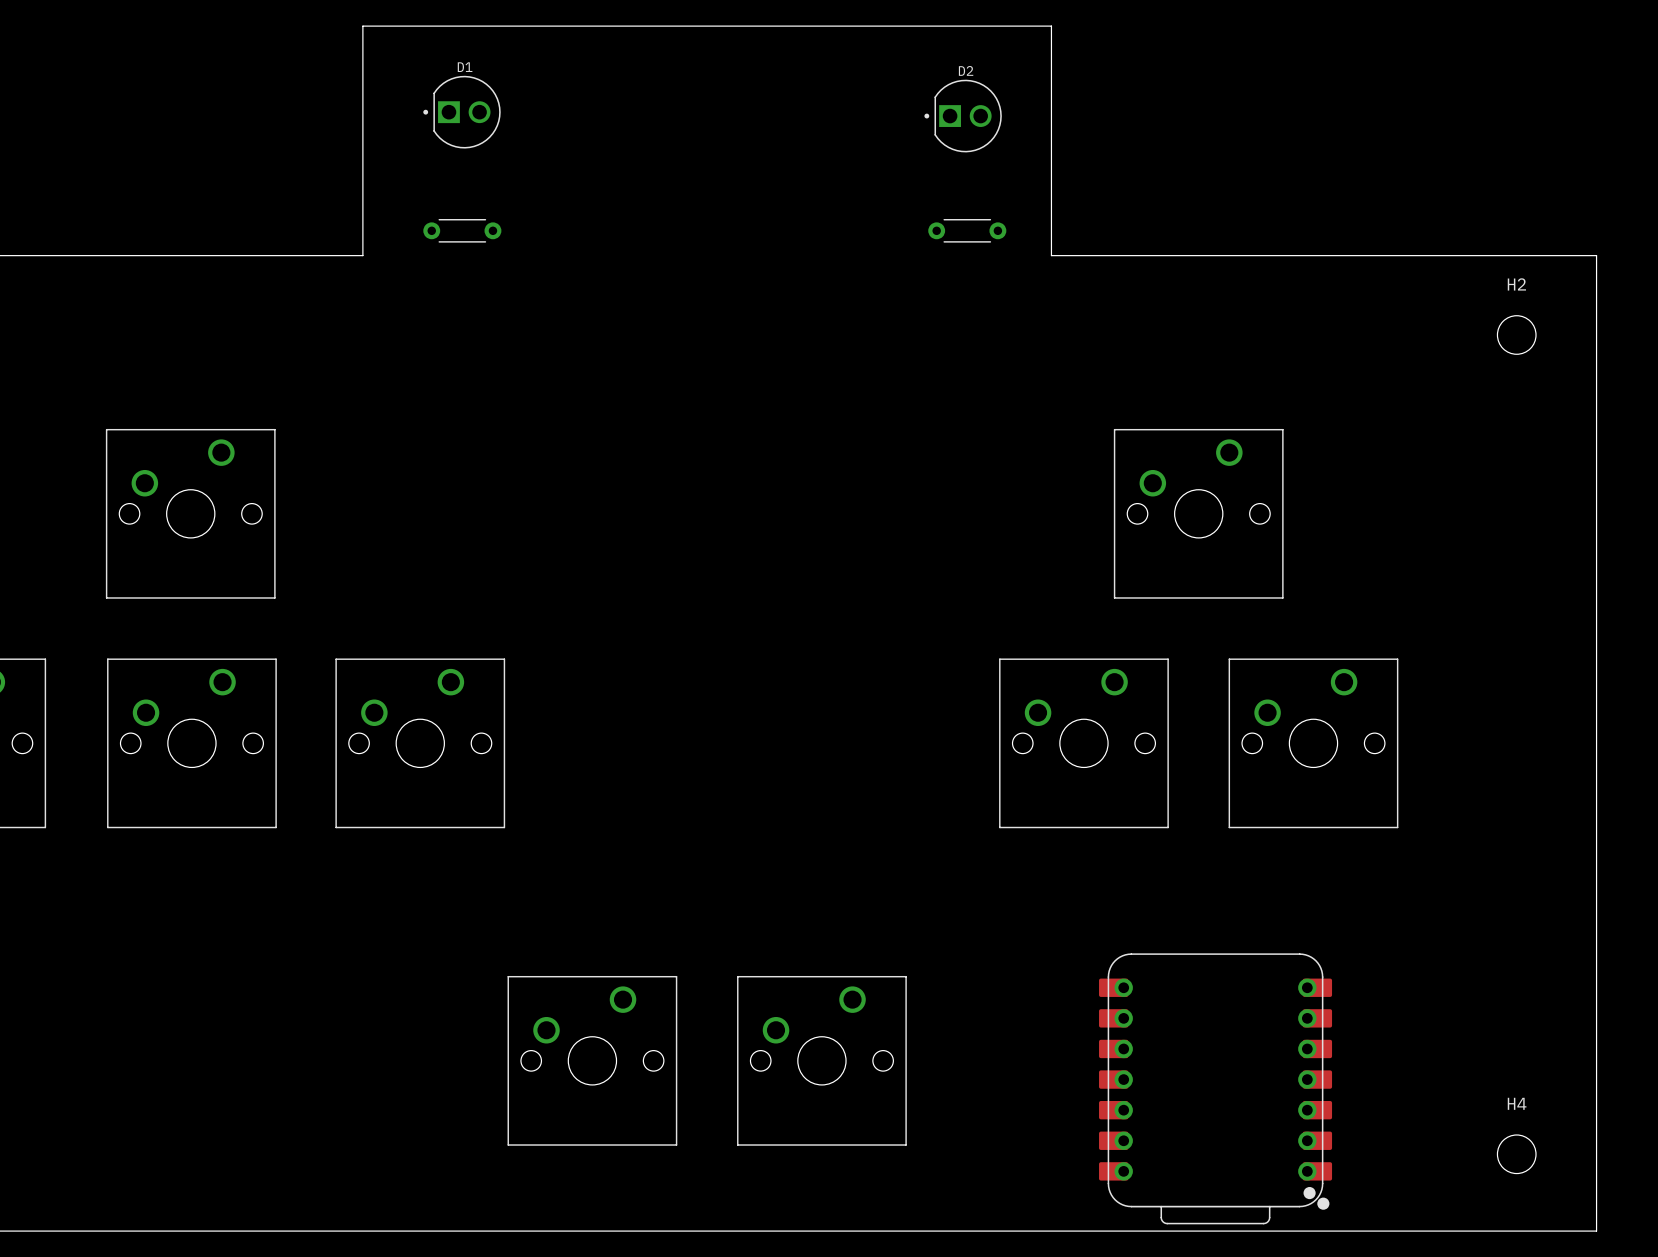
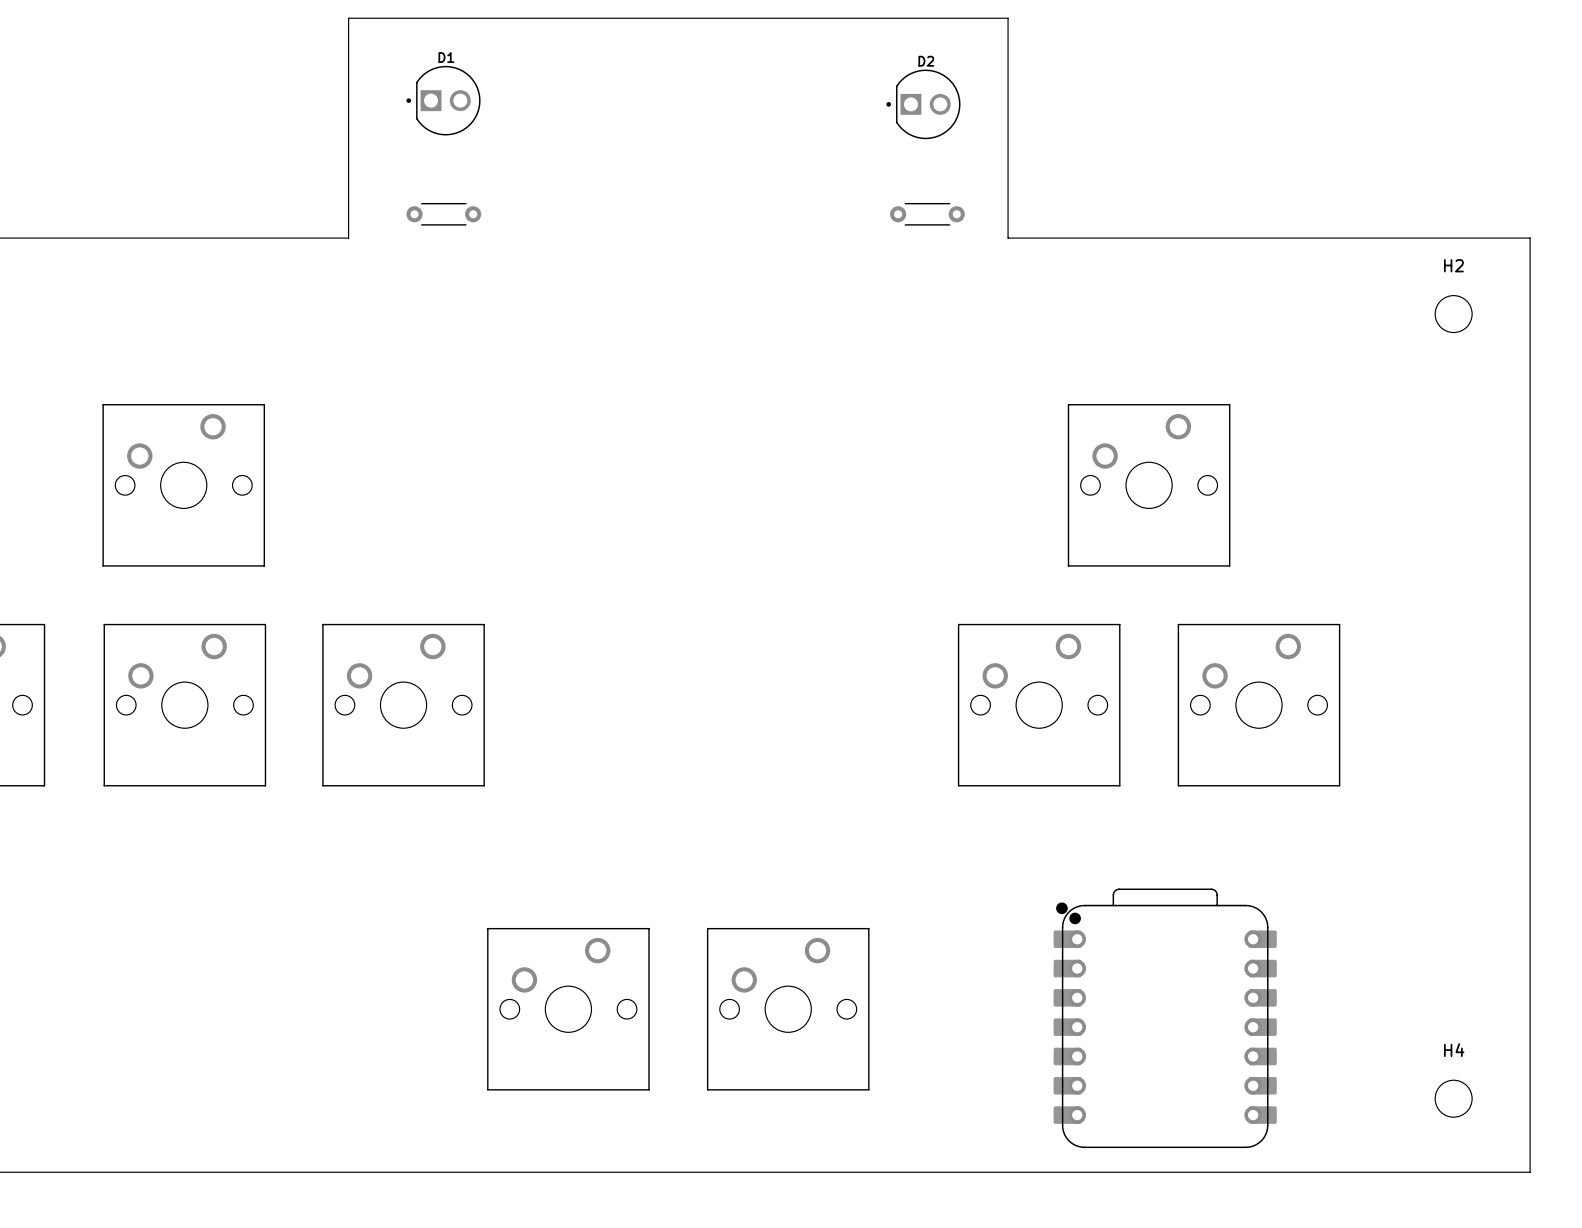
part rotation: 0° (1215, 1088) -> 180° (1165, 1018)

